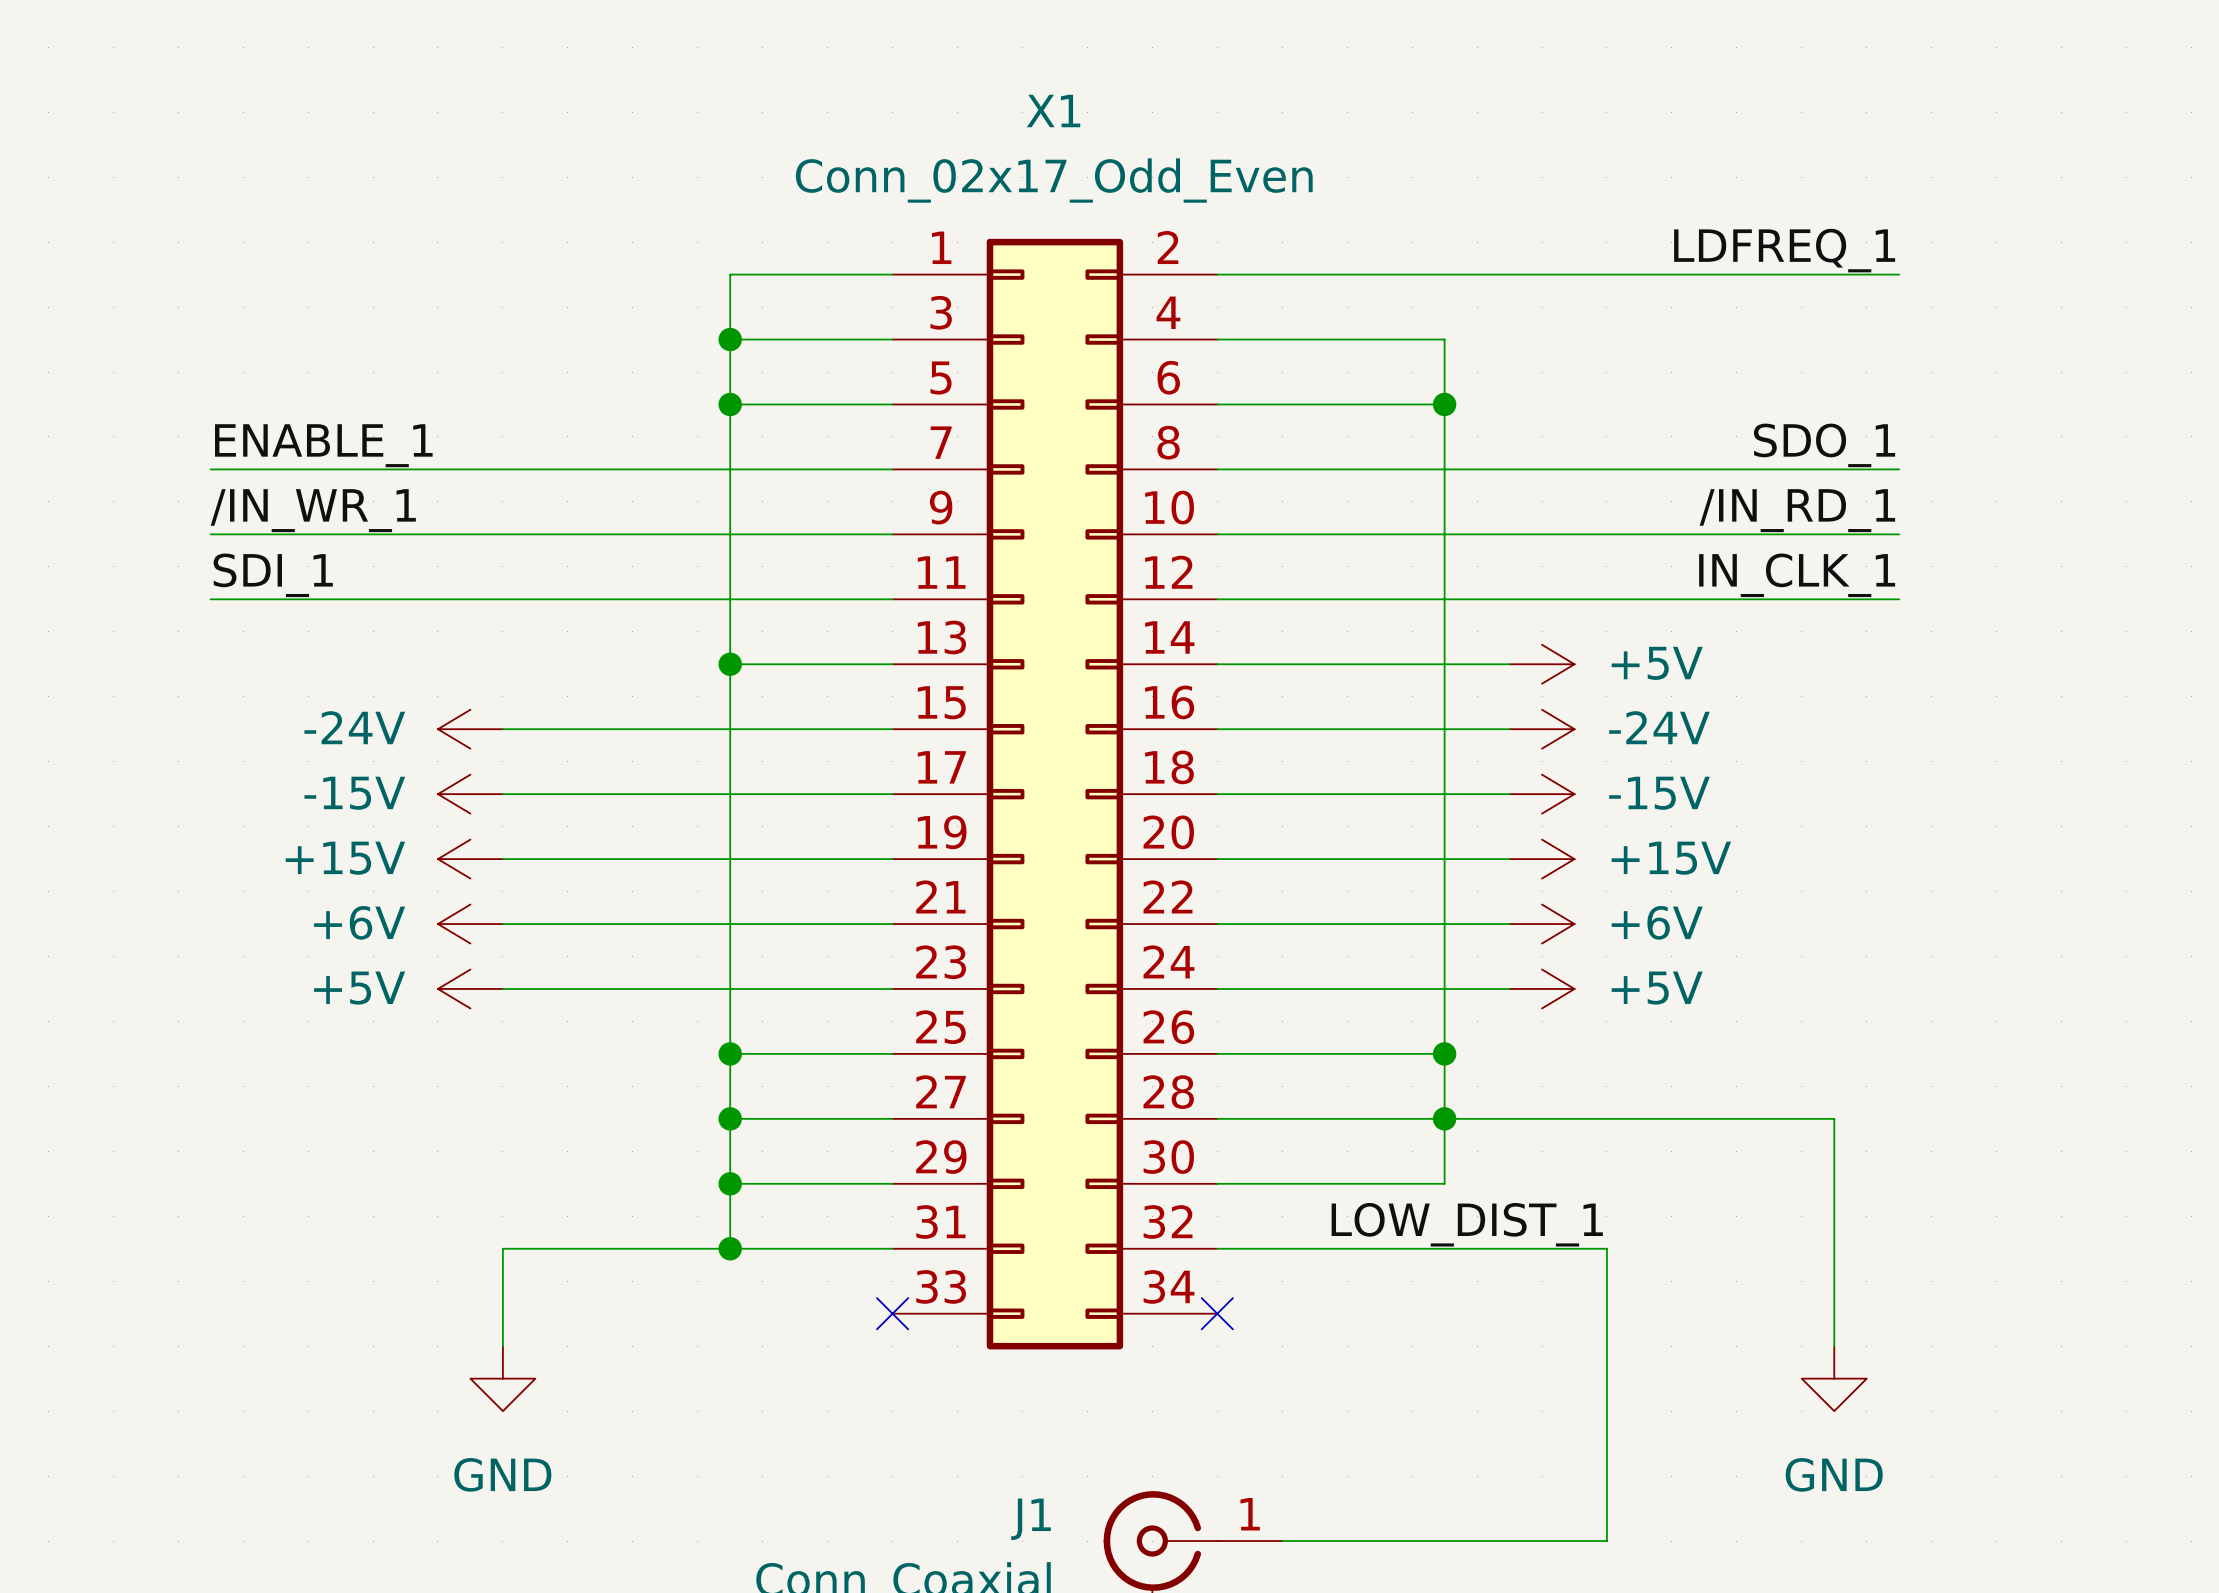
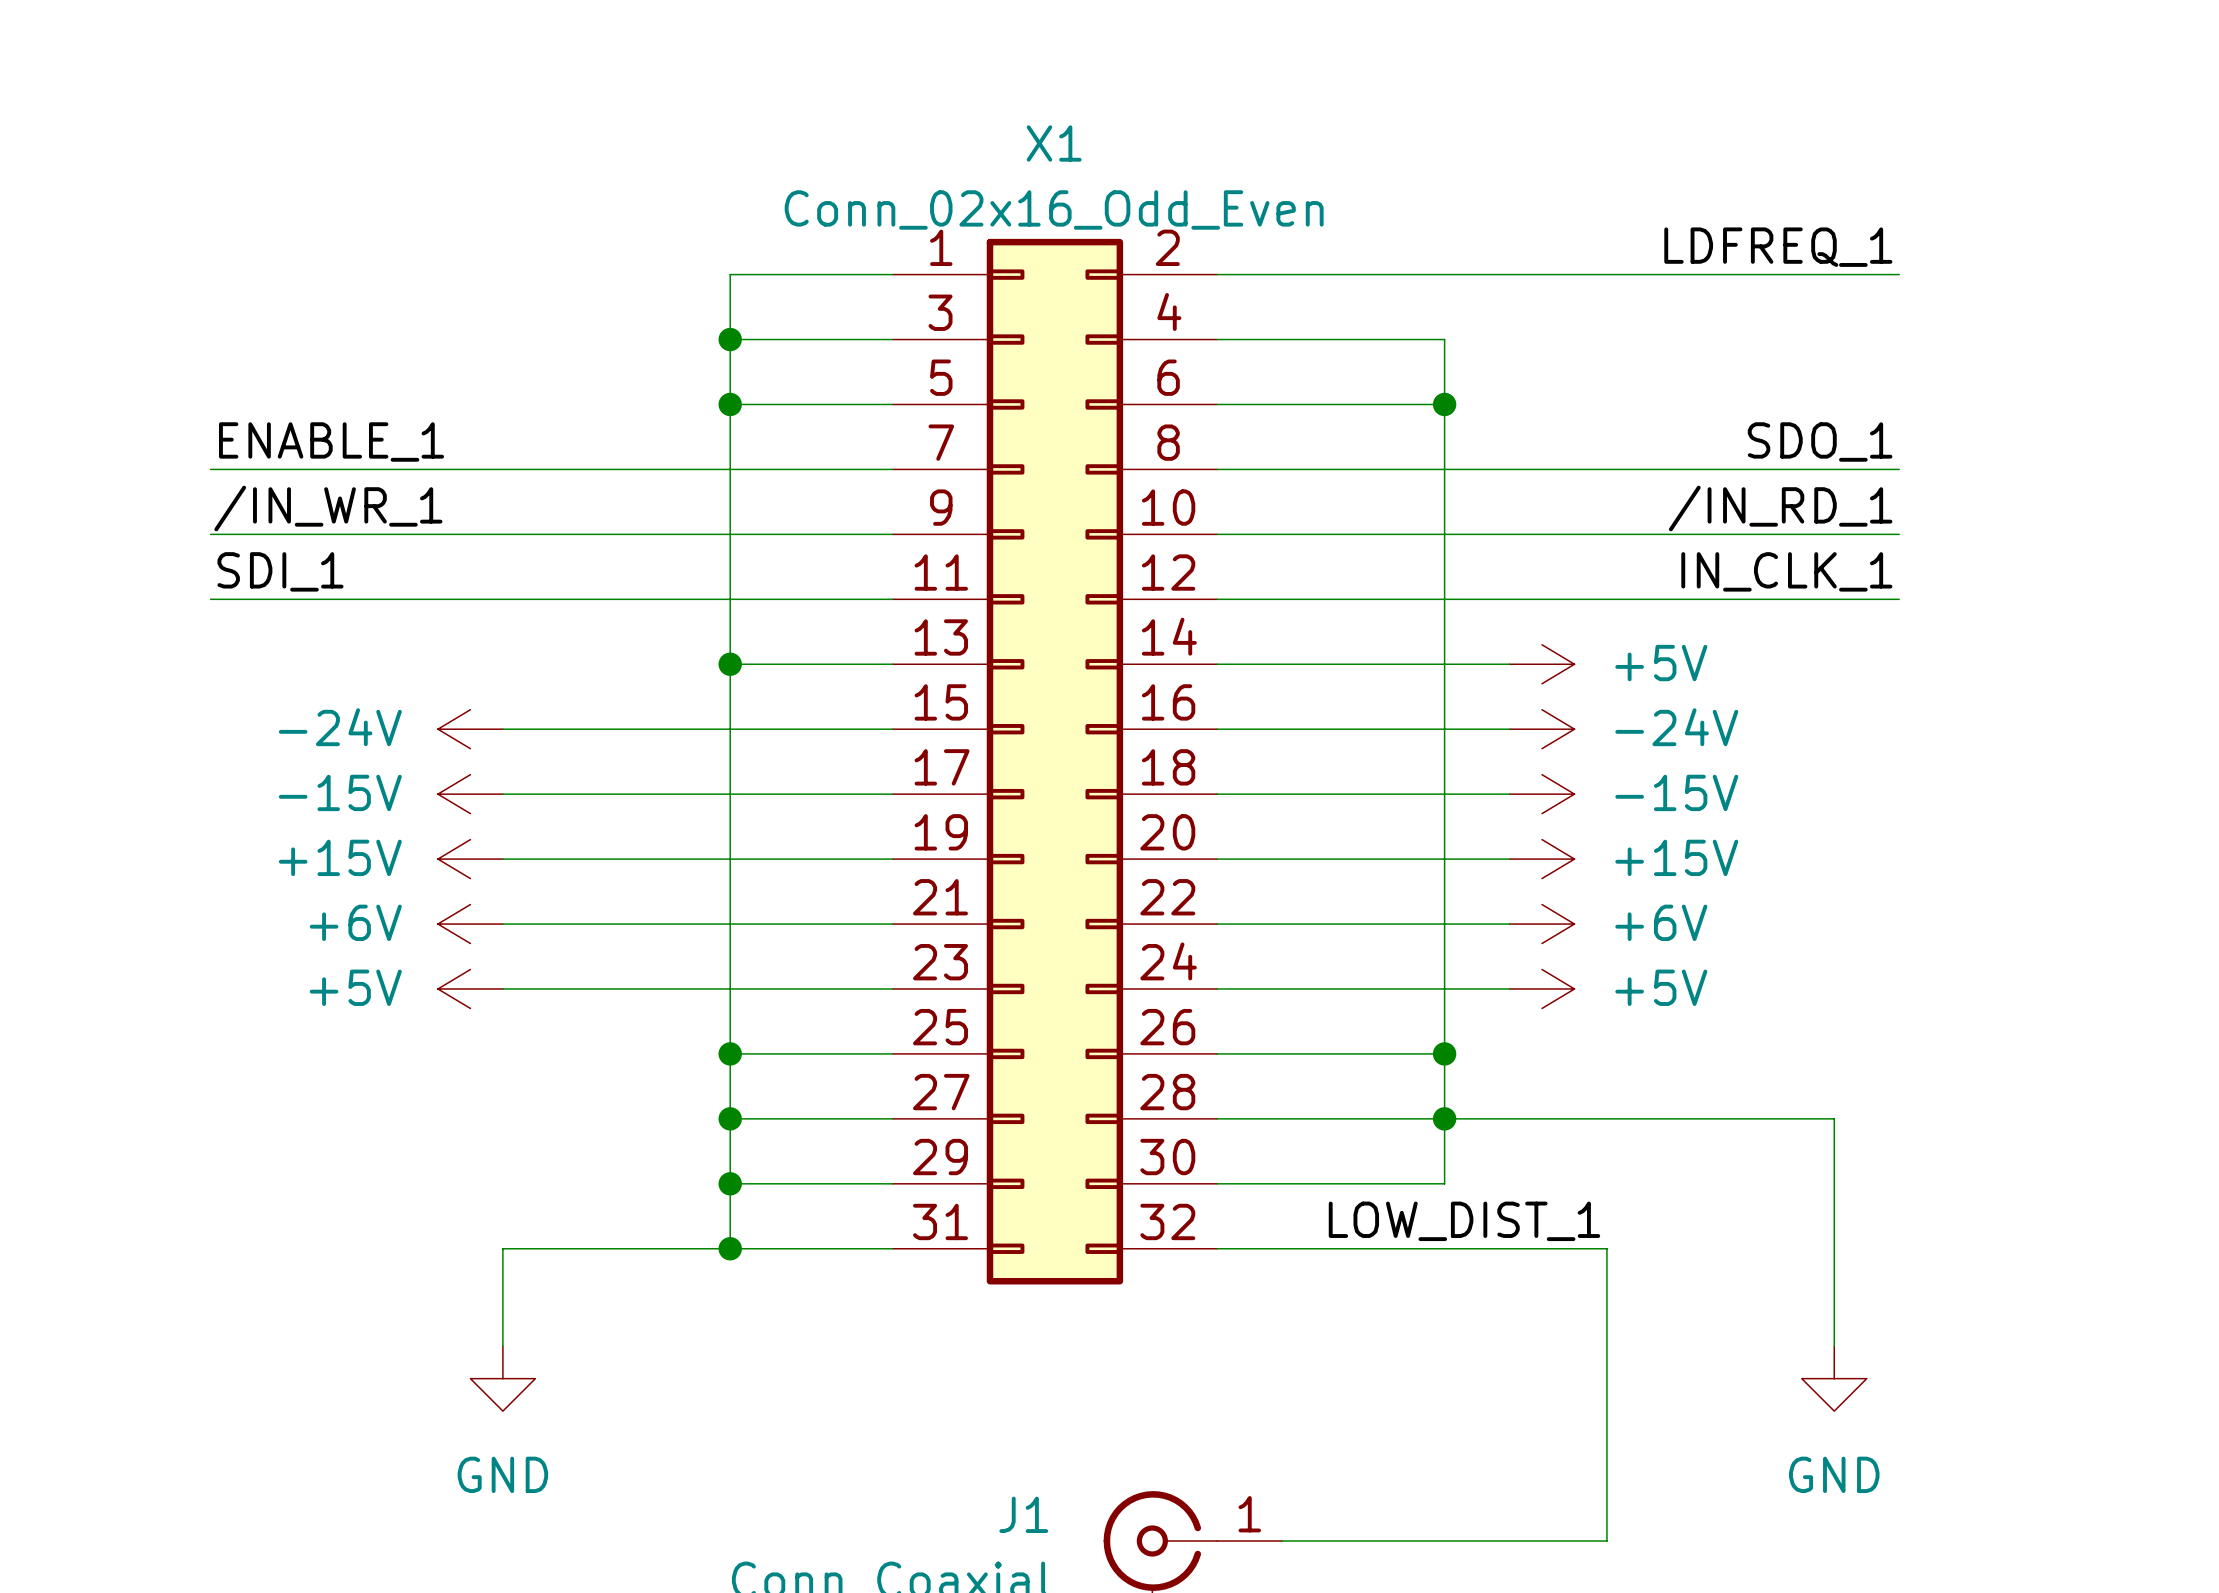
X1 name position: X1 (1053, 111) -> X1 (1054, 143)
X1 value: Conn_02x17_Odd_Even (1054, 180) -> Conn_02x16_Odd_Even (1054, 209)
X1 symbol: [892, 238, 1218, 1350] -> [892, 238, 1218, 1285]
no-connect mark: (892, 1313) -> none
no-connect mark: (1217, 1313) -> none

